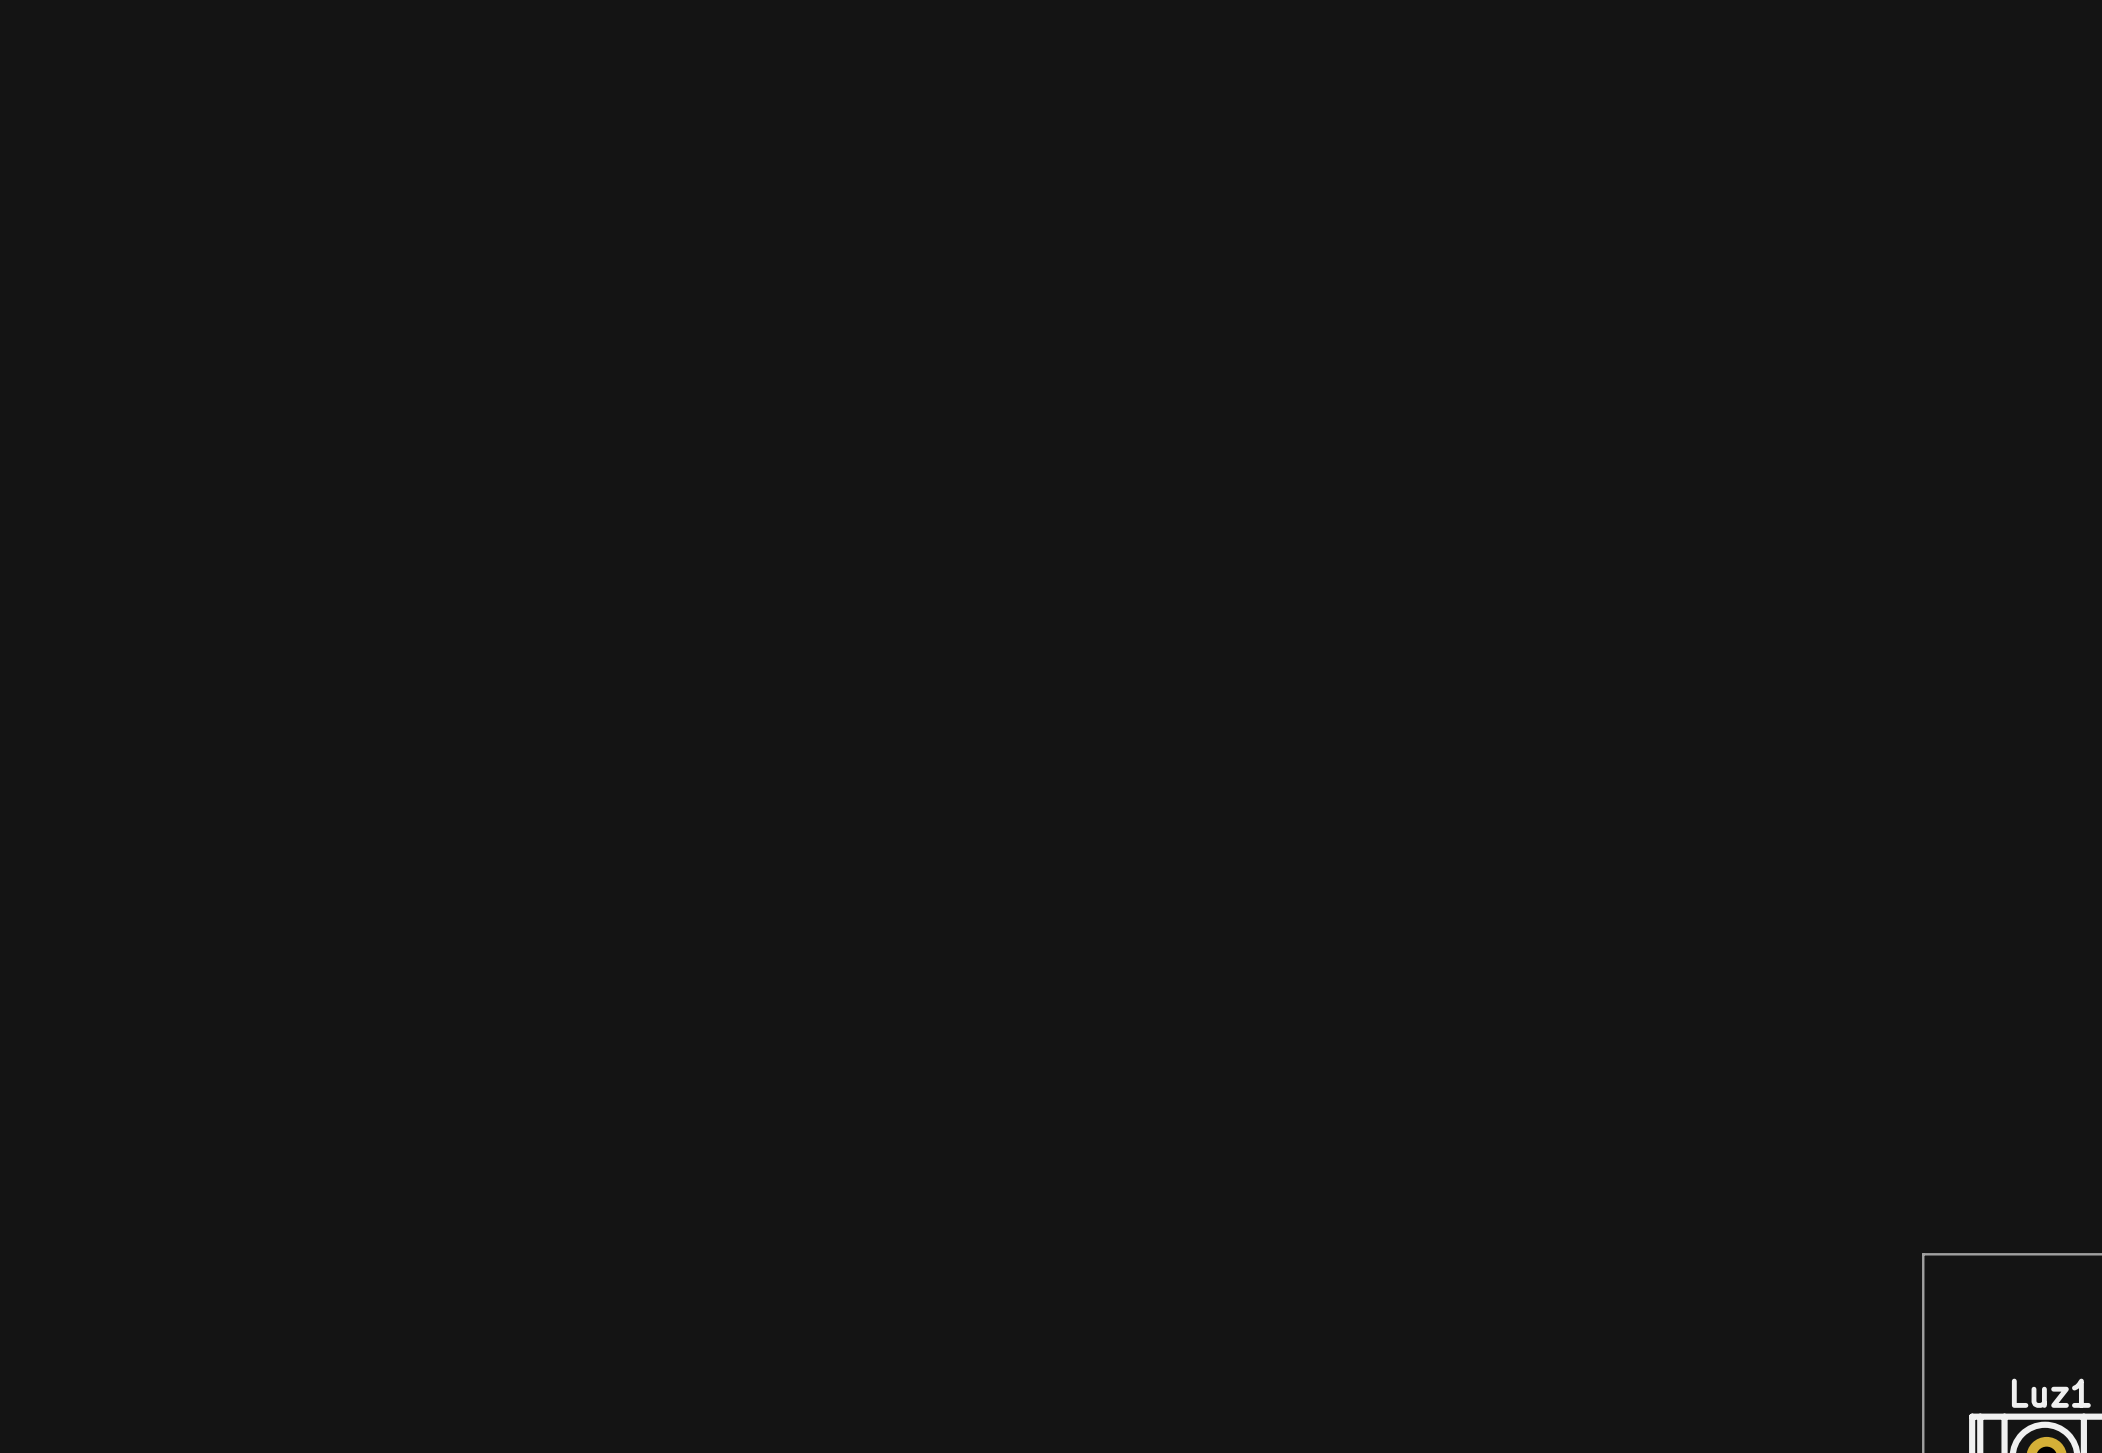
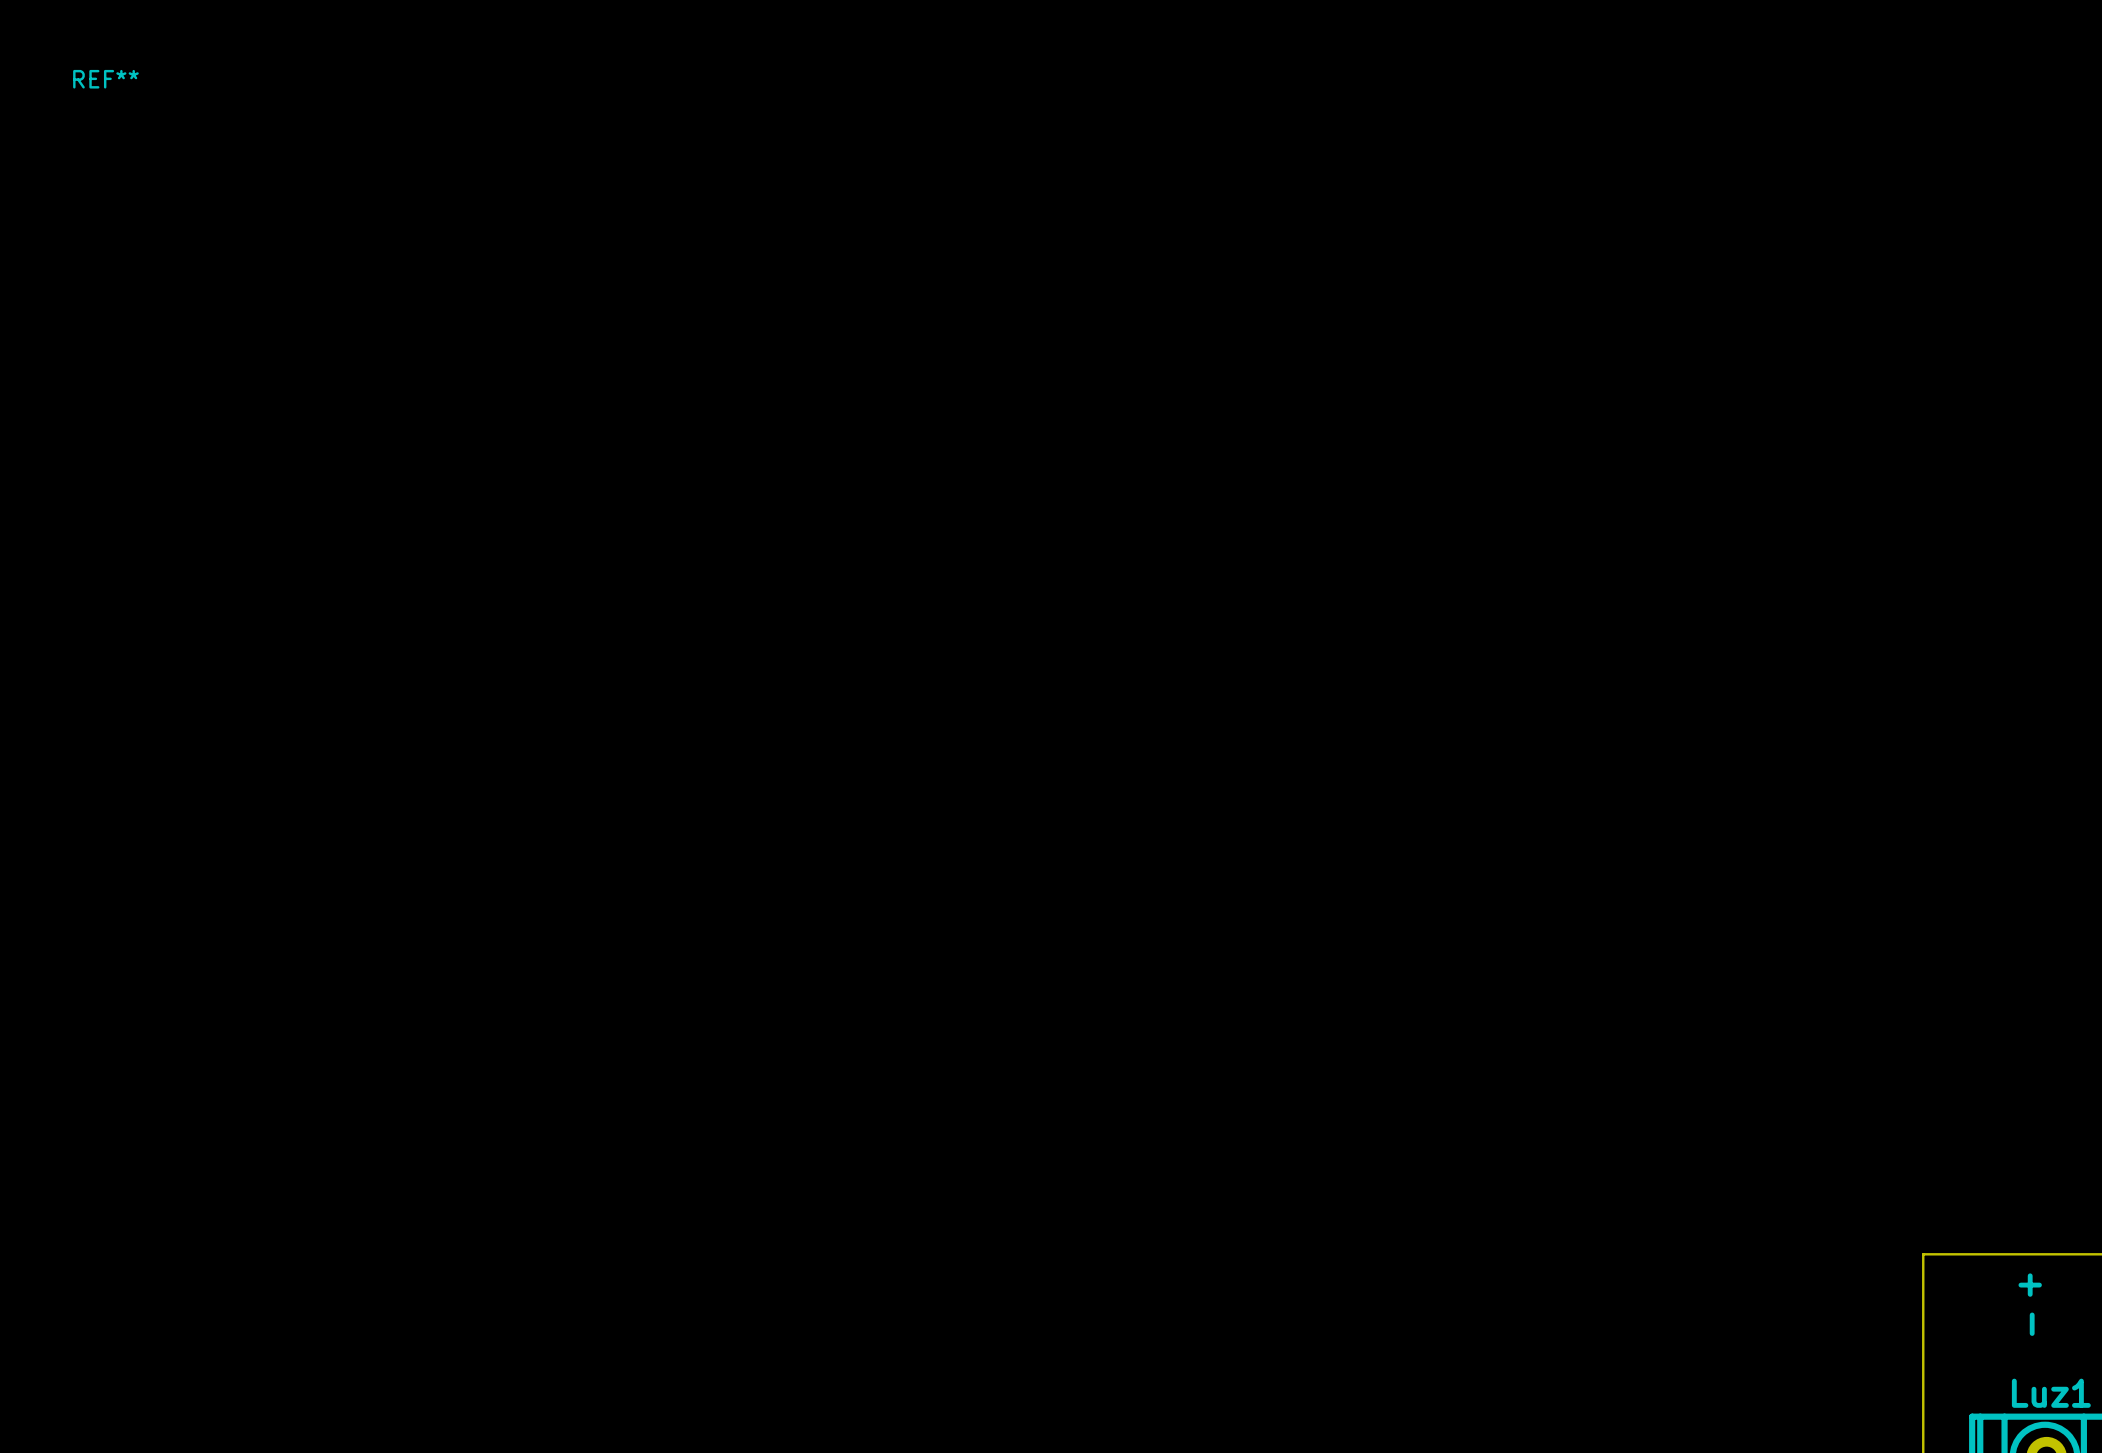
REF**: none -> (105, 79)
text: none -> + (2030, 1285)
text: none -> - (2032, 1324)

